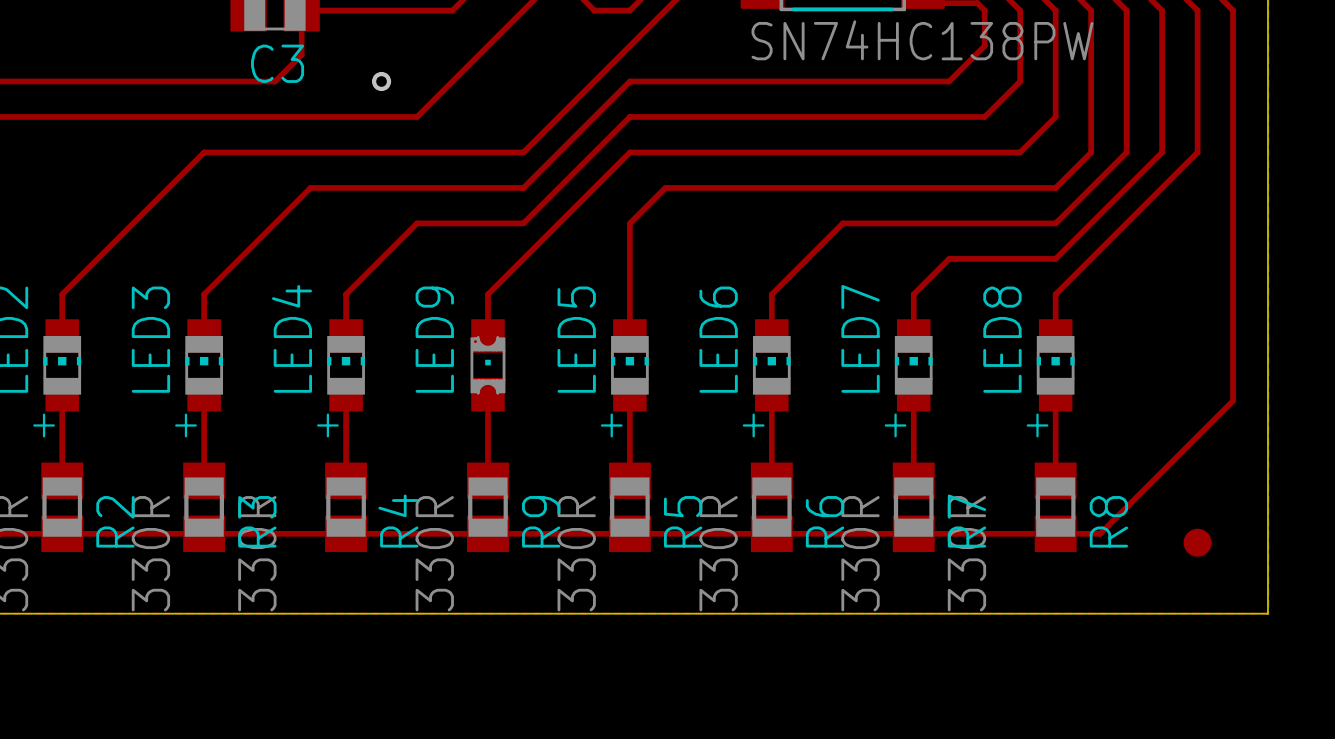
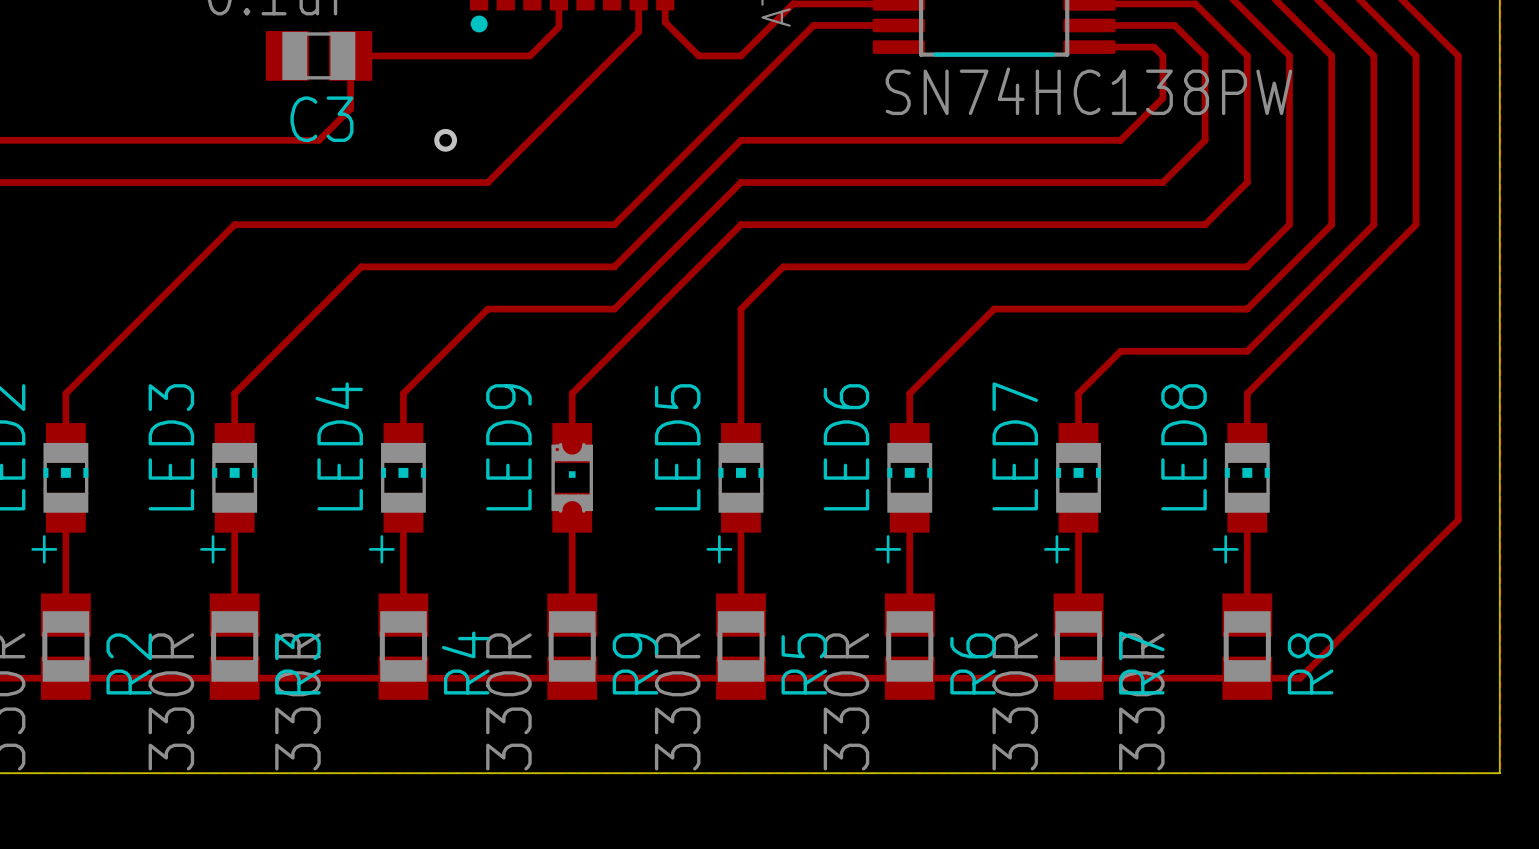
part: (1197, 542) -> none

